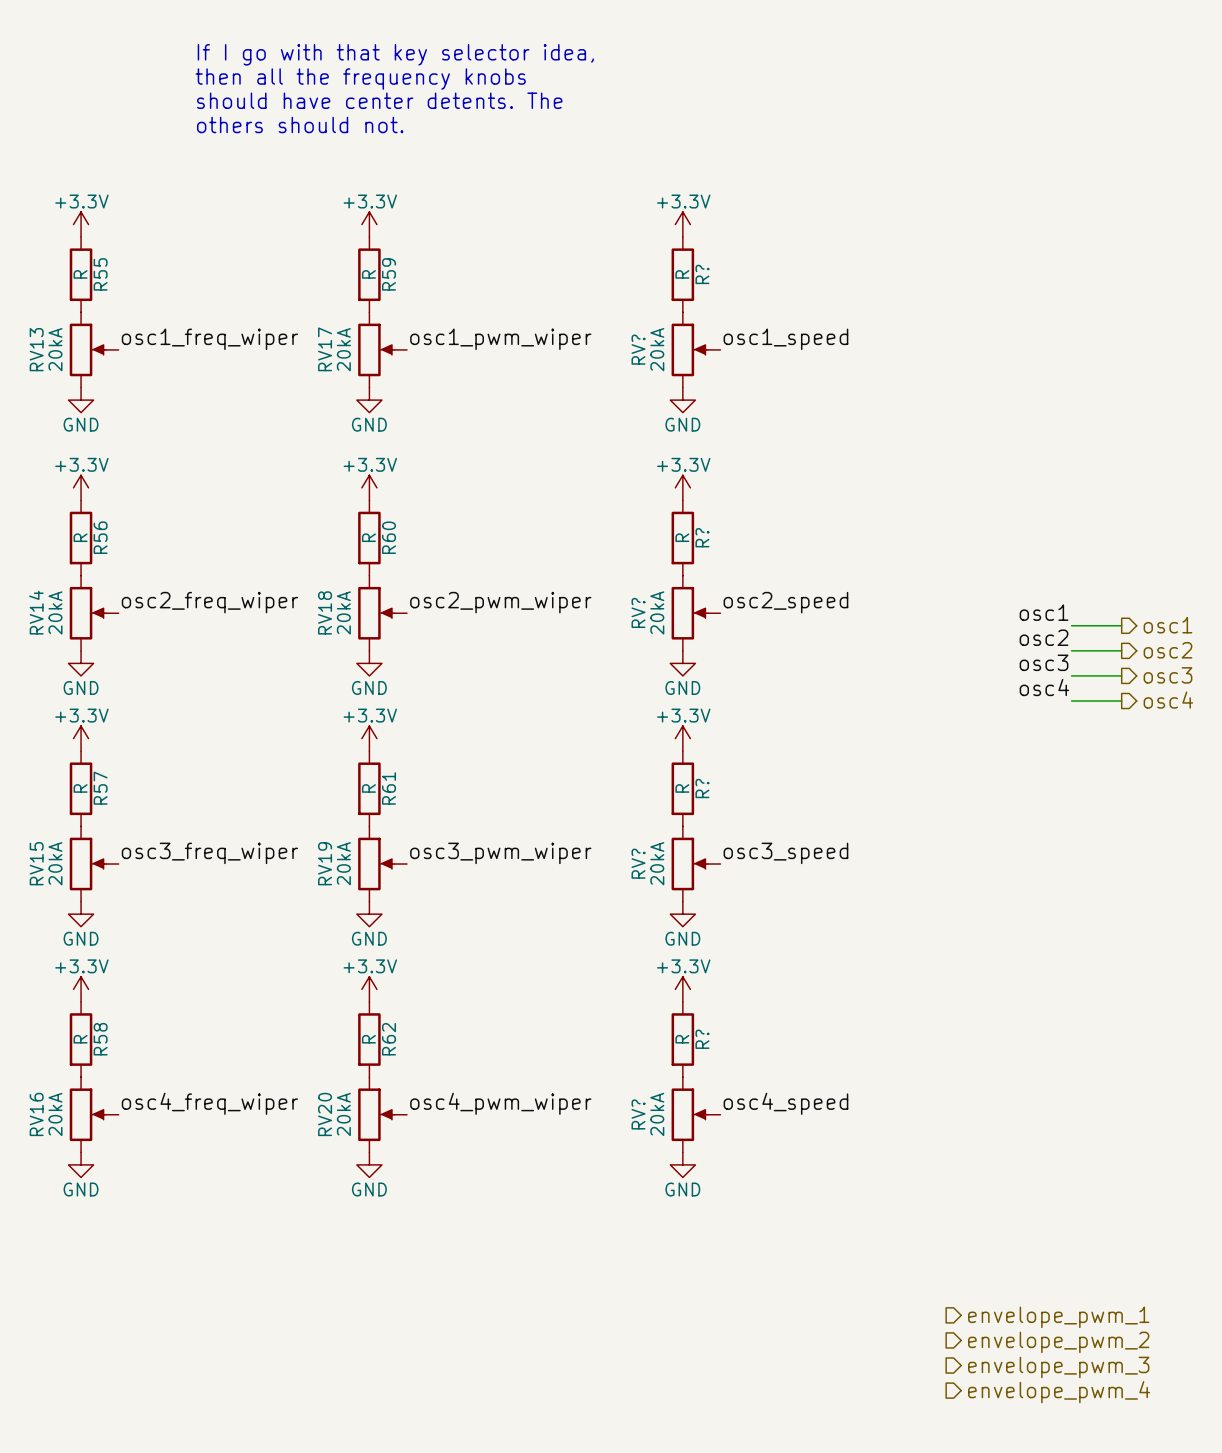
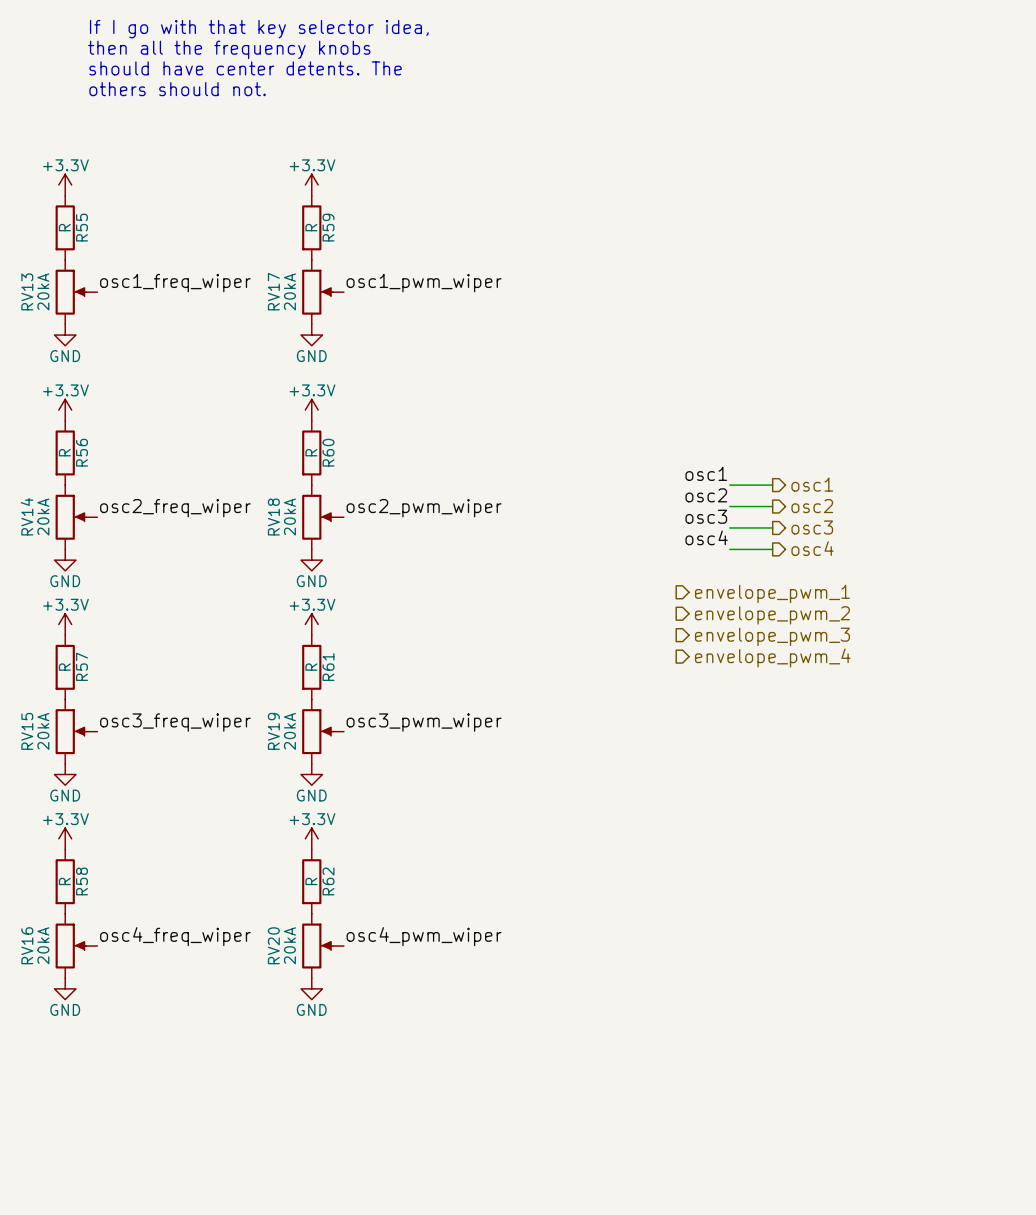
text position: If I go with that key selector idea, (395, 54) -> If I go with that key selector idea, (259, 29)
text position: then all the frequency knobs (360, 79) -> then all the frequency knobs (229, 49)
text position: should have center detents. The (379, 100) -> should have center detents. The (245, 68)
text position: others should not. (300, 124) -> others should not. (177, 89)
power symbol: +3.3V (682, 224) -> none
R?: R (682, 274) -> none
label: osc1_speed (785, 339) -> none
RV?: 20kA (696, 349) -> none
power symbol: GND (682, 400) -> none
power symbol: +3.3V (682, 487) -> none
R?: R (682, 538) -> none
label: osc2_speed (785, 602) -> none
label position: osc1 (1044, 612) -> osc1 (706, 473)
RV?: 20kA (696, 613) -> none
wire: (1071, 625) (1121, 625) -> (729, 485) (772, 485)
hierarchical label position: osc1 (1167, 625) -> osc1 (812, 484)
label position: osc2 (1044, 637) -> osc2 (706, 495)
wire: (1071, 650) (1121, 650) -> (729, 506) (772, 506)
hierarchical label position: osc2 (1167, 650) -> osc2 (812, 506)
label position: osc3 (1044, 662) -> osc3 (706, 516)
power symbol: GND (682, 663) -> none
wire: (1071, 675) (1121, 675) -> (729, 527) (772, 527)
hierarchical label position: osc3 (1167, 675) -> osc3 (812, 527)
label position: osc4 (1044, 687) -> osc4 (706, 537)
hierarchical label position: osc4 (1168, 700) -> osc4 (812, 548)
wire: (1071, 701) (1121, 701) -> (729, 549) (772, 549)
hierarchical label: none -> envelope_pwm_1 (772, 593)
hierarchical label: none -> envelope_pwm_2 (772, 615)
power symbol: +3.3V (682, 738) -> none
hierarchical label: none -> envelope_pwm_3 (772, 636)
hierarchical label: none -> envelope_pwm_4 (772, 657)
R?: R (682, 788) -> none
label: osc3_speed (785, 853) -> none
RV?: 20kA (696, 864) -> none
power symbol: GND (682, 914) -> none
power symbol: +3.3V (682, 989) -> none
R?: R (682, 1039) -> none
label: osc4_speed (785, 1103) -> none
RV?: 20kA (696, 1114) -> none
power symbol: GND (682, 1164) -> none
hierarchical label: envelope_pwm_1 (1058, 1317) -> none
hierarchical label: envelope_pwm_2 (1058, 1342) -> none
hierarchical label: envelope_pwm_3 (1058, 1367) -> none
hierarchical label: envelope_pwm_4 (1059, 1392) -> none

